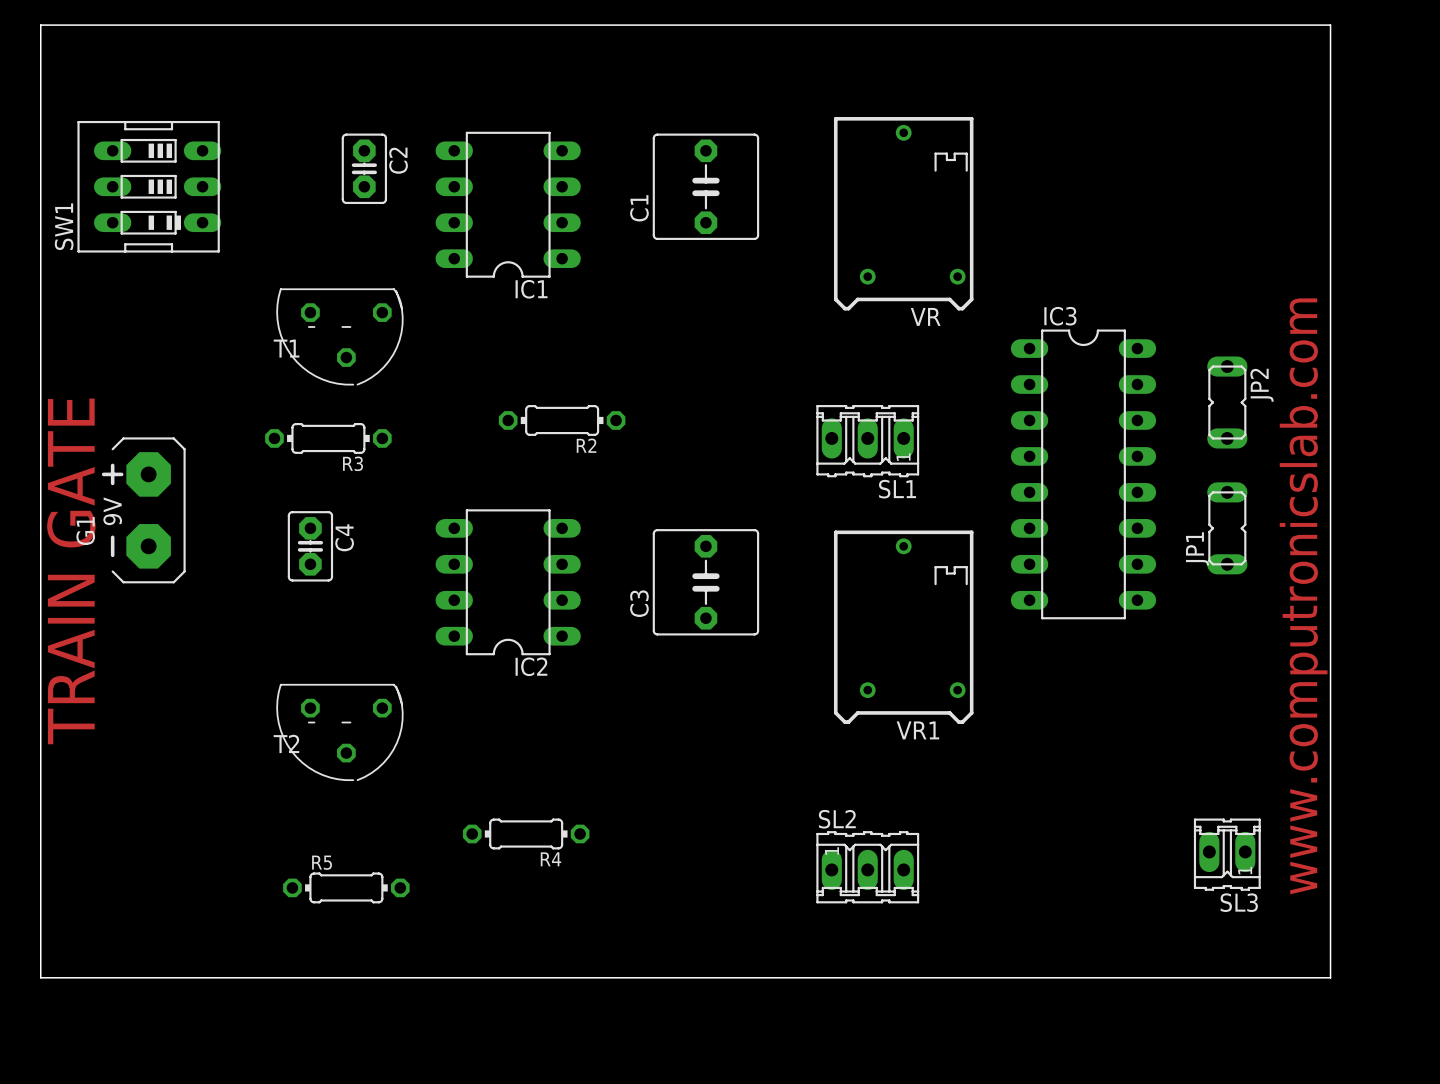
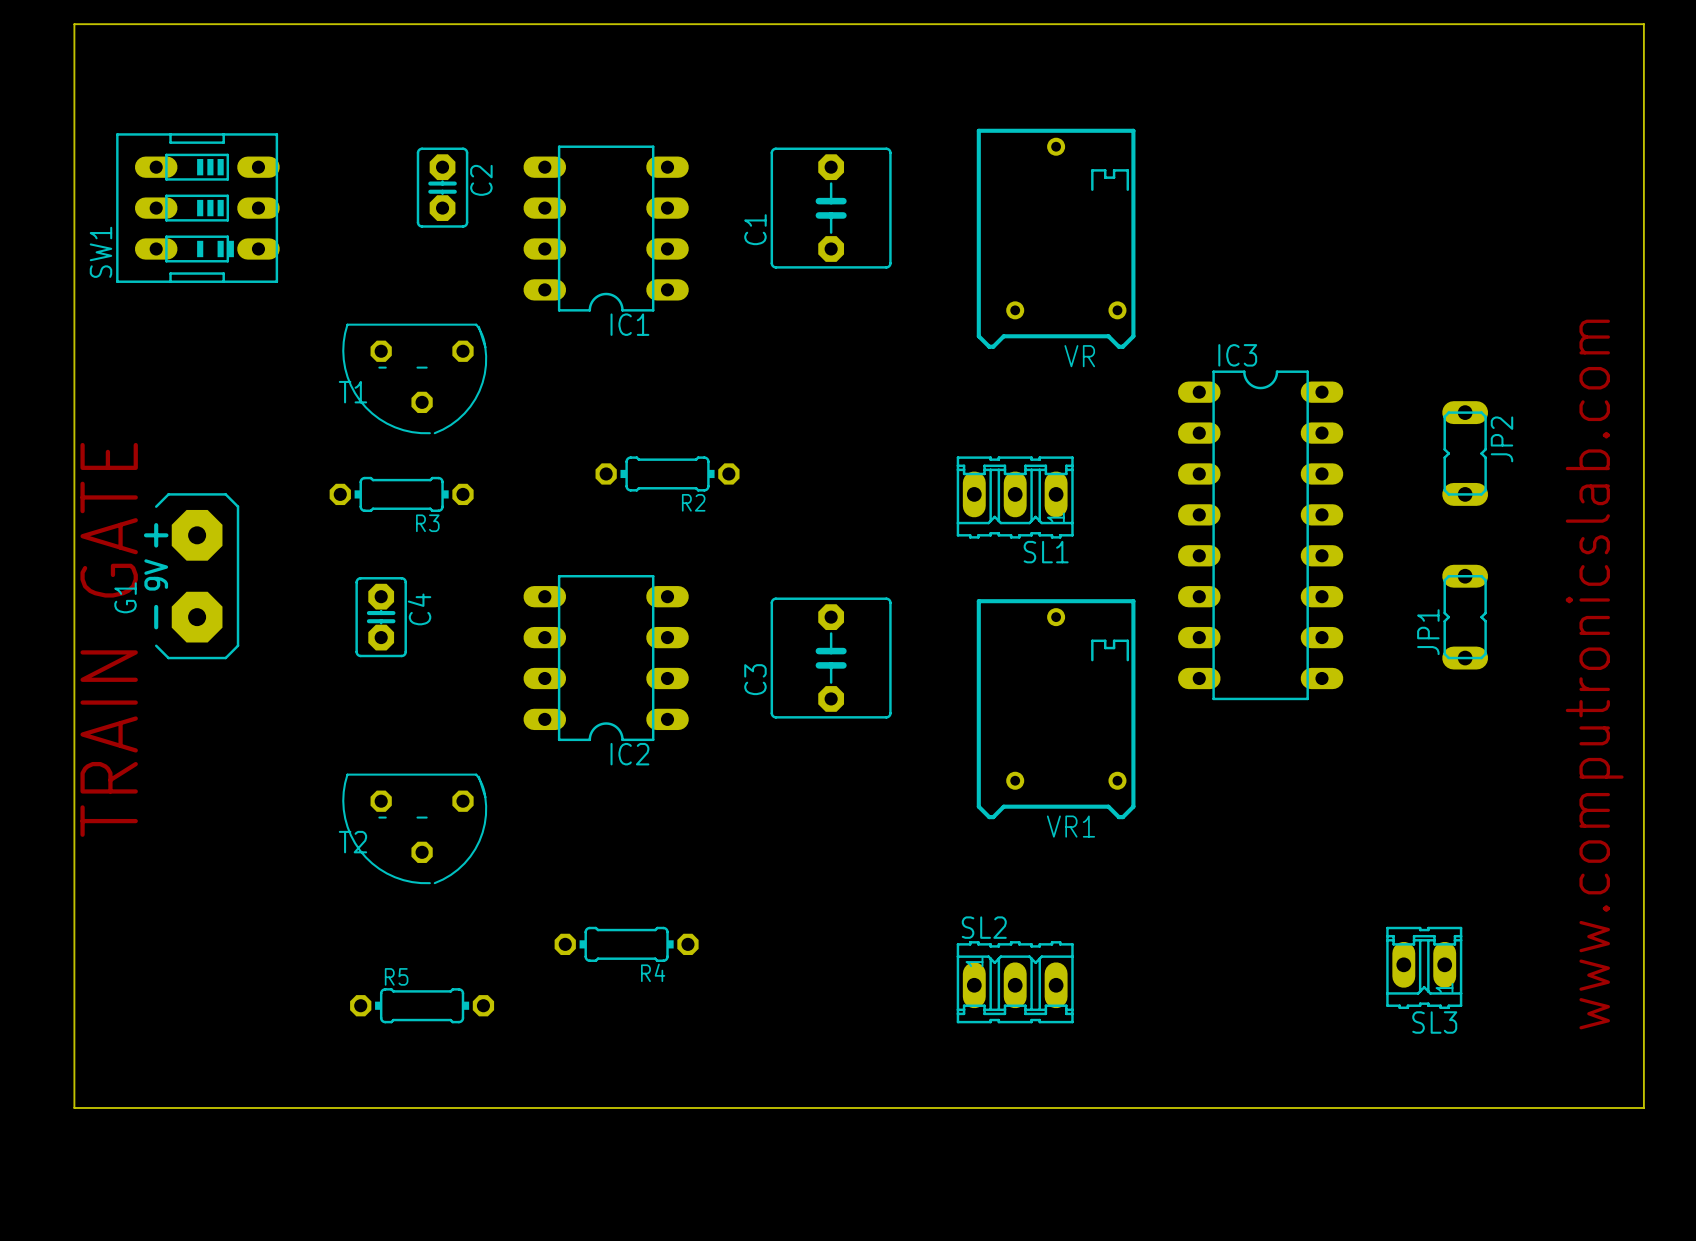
board edge: (1330, 25) (1330, 977) -> (1541, 24) (1643, 24) (1643, 1107) (1541, 1107)
JP2 position: (1227, 402) -> (1465, 453)
JP1 position: (1227, 528) -> (1465, 617)
text position: www.computronicslab.com (1303, 596) -> www.computronicslab.com (1594, 674)

